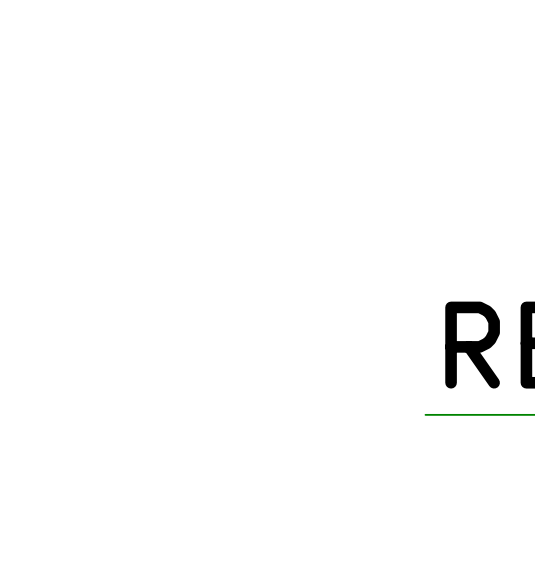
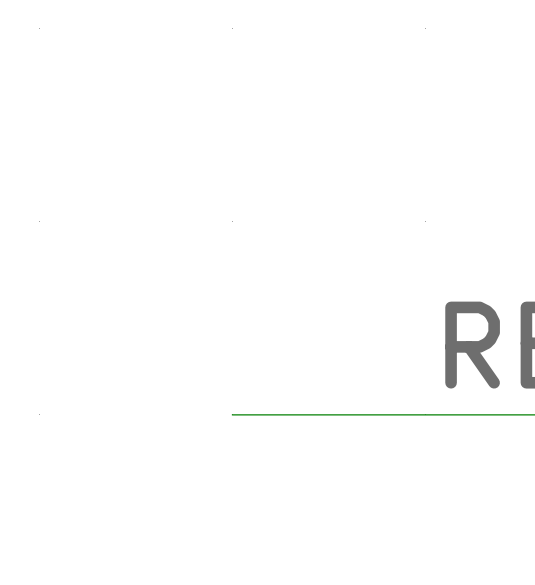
wire: none -> (232, 414) (425, 414)

